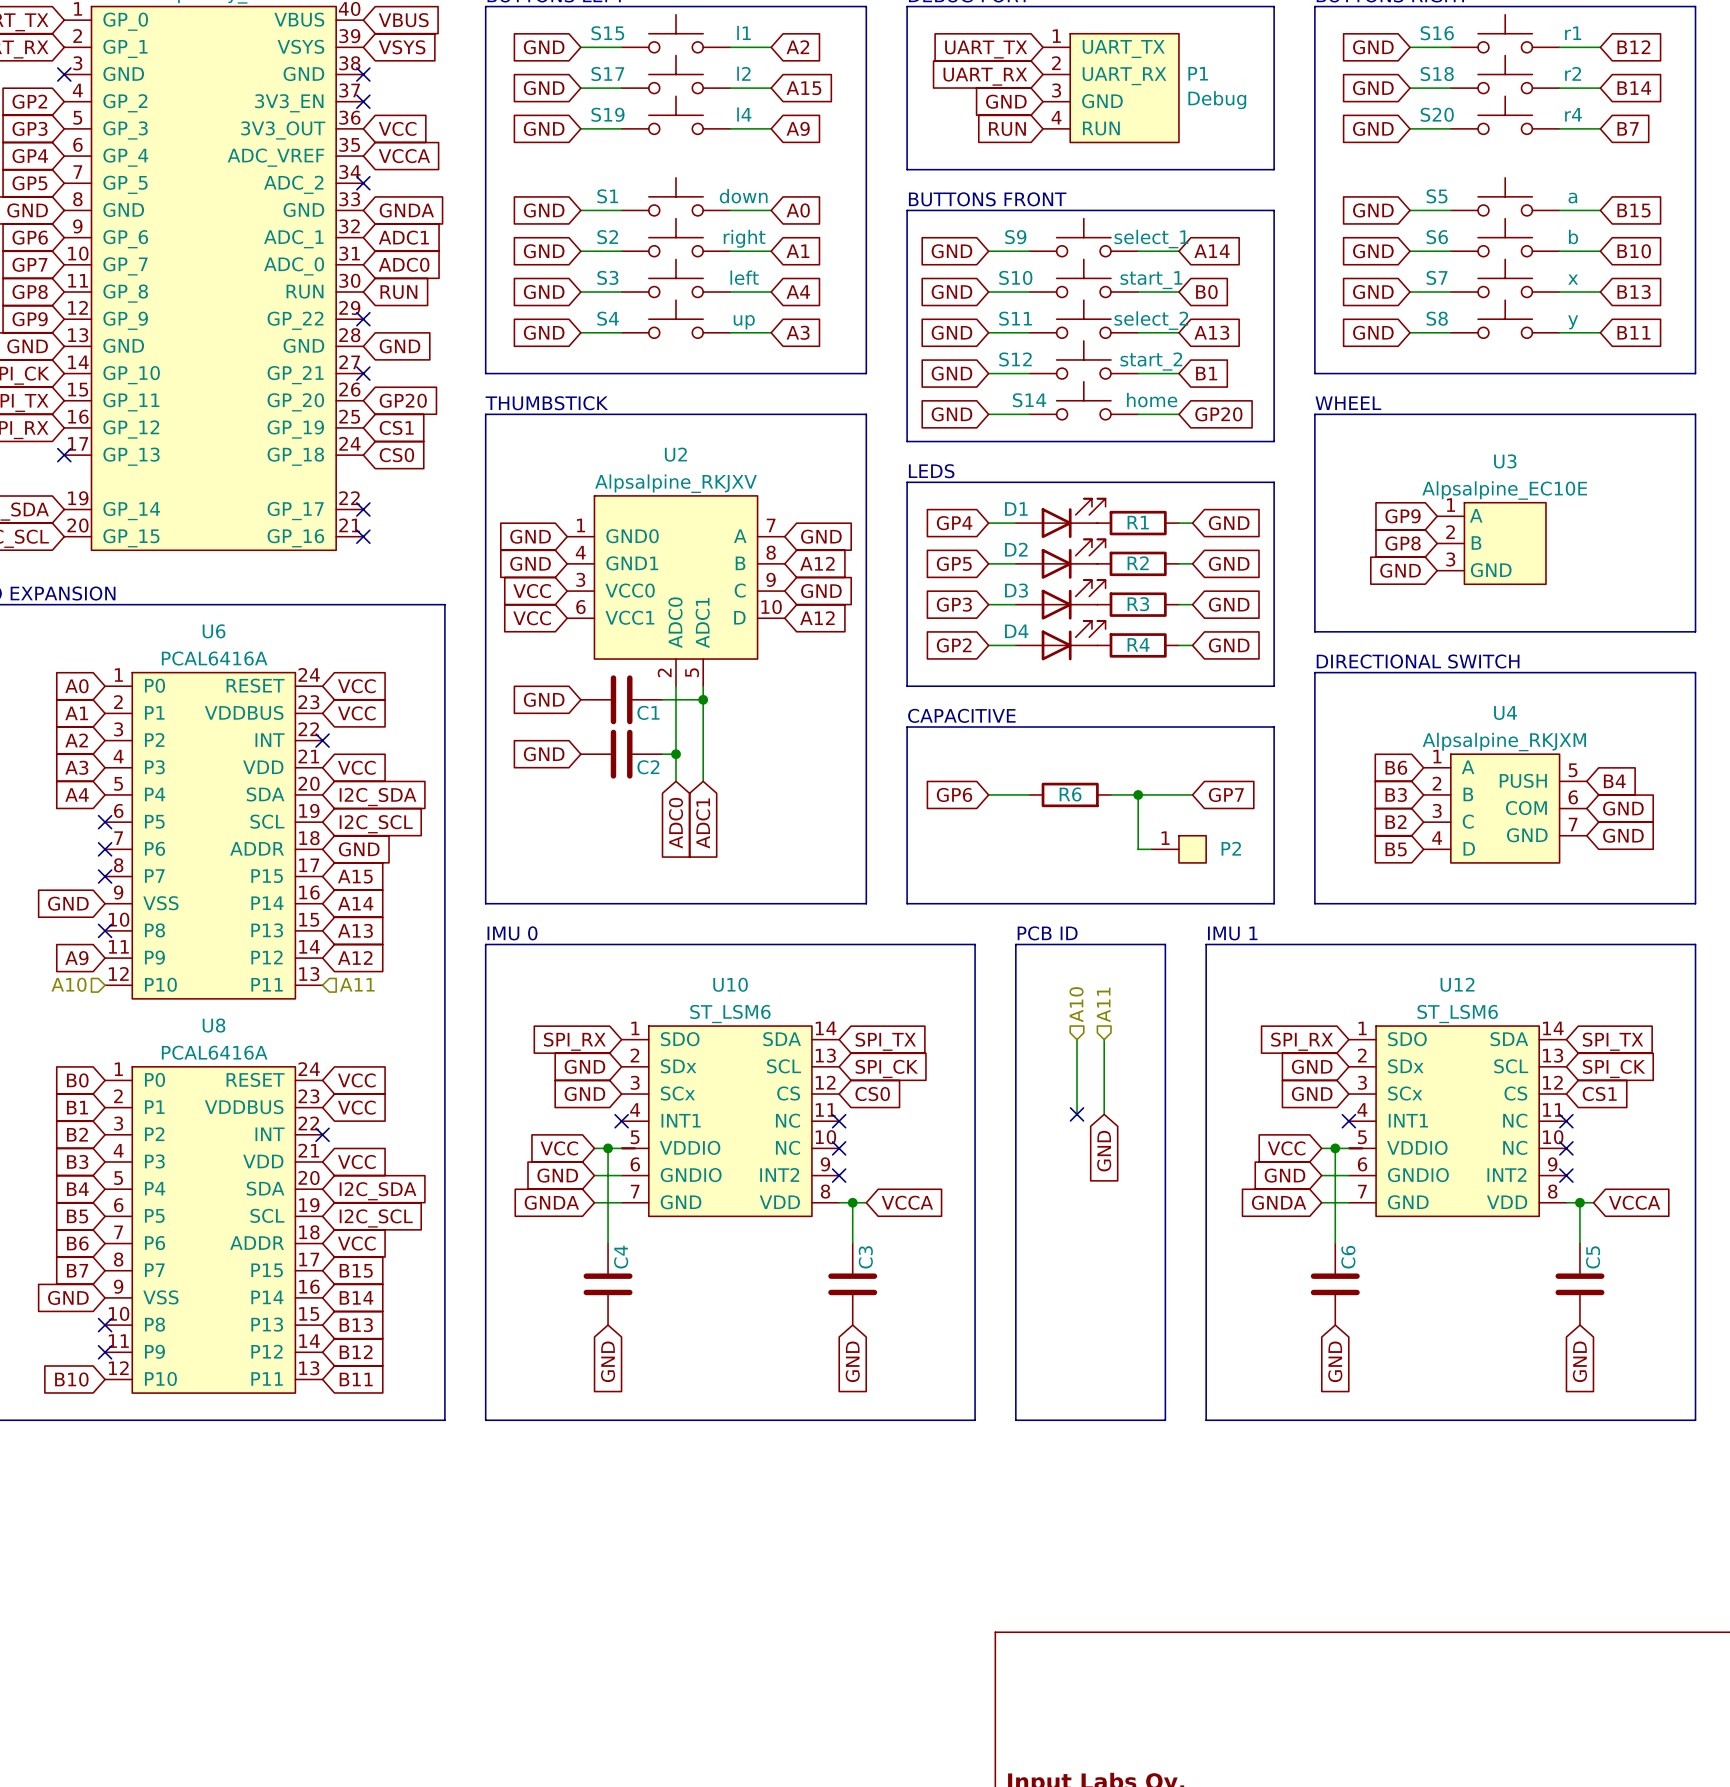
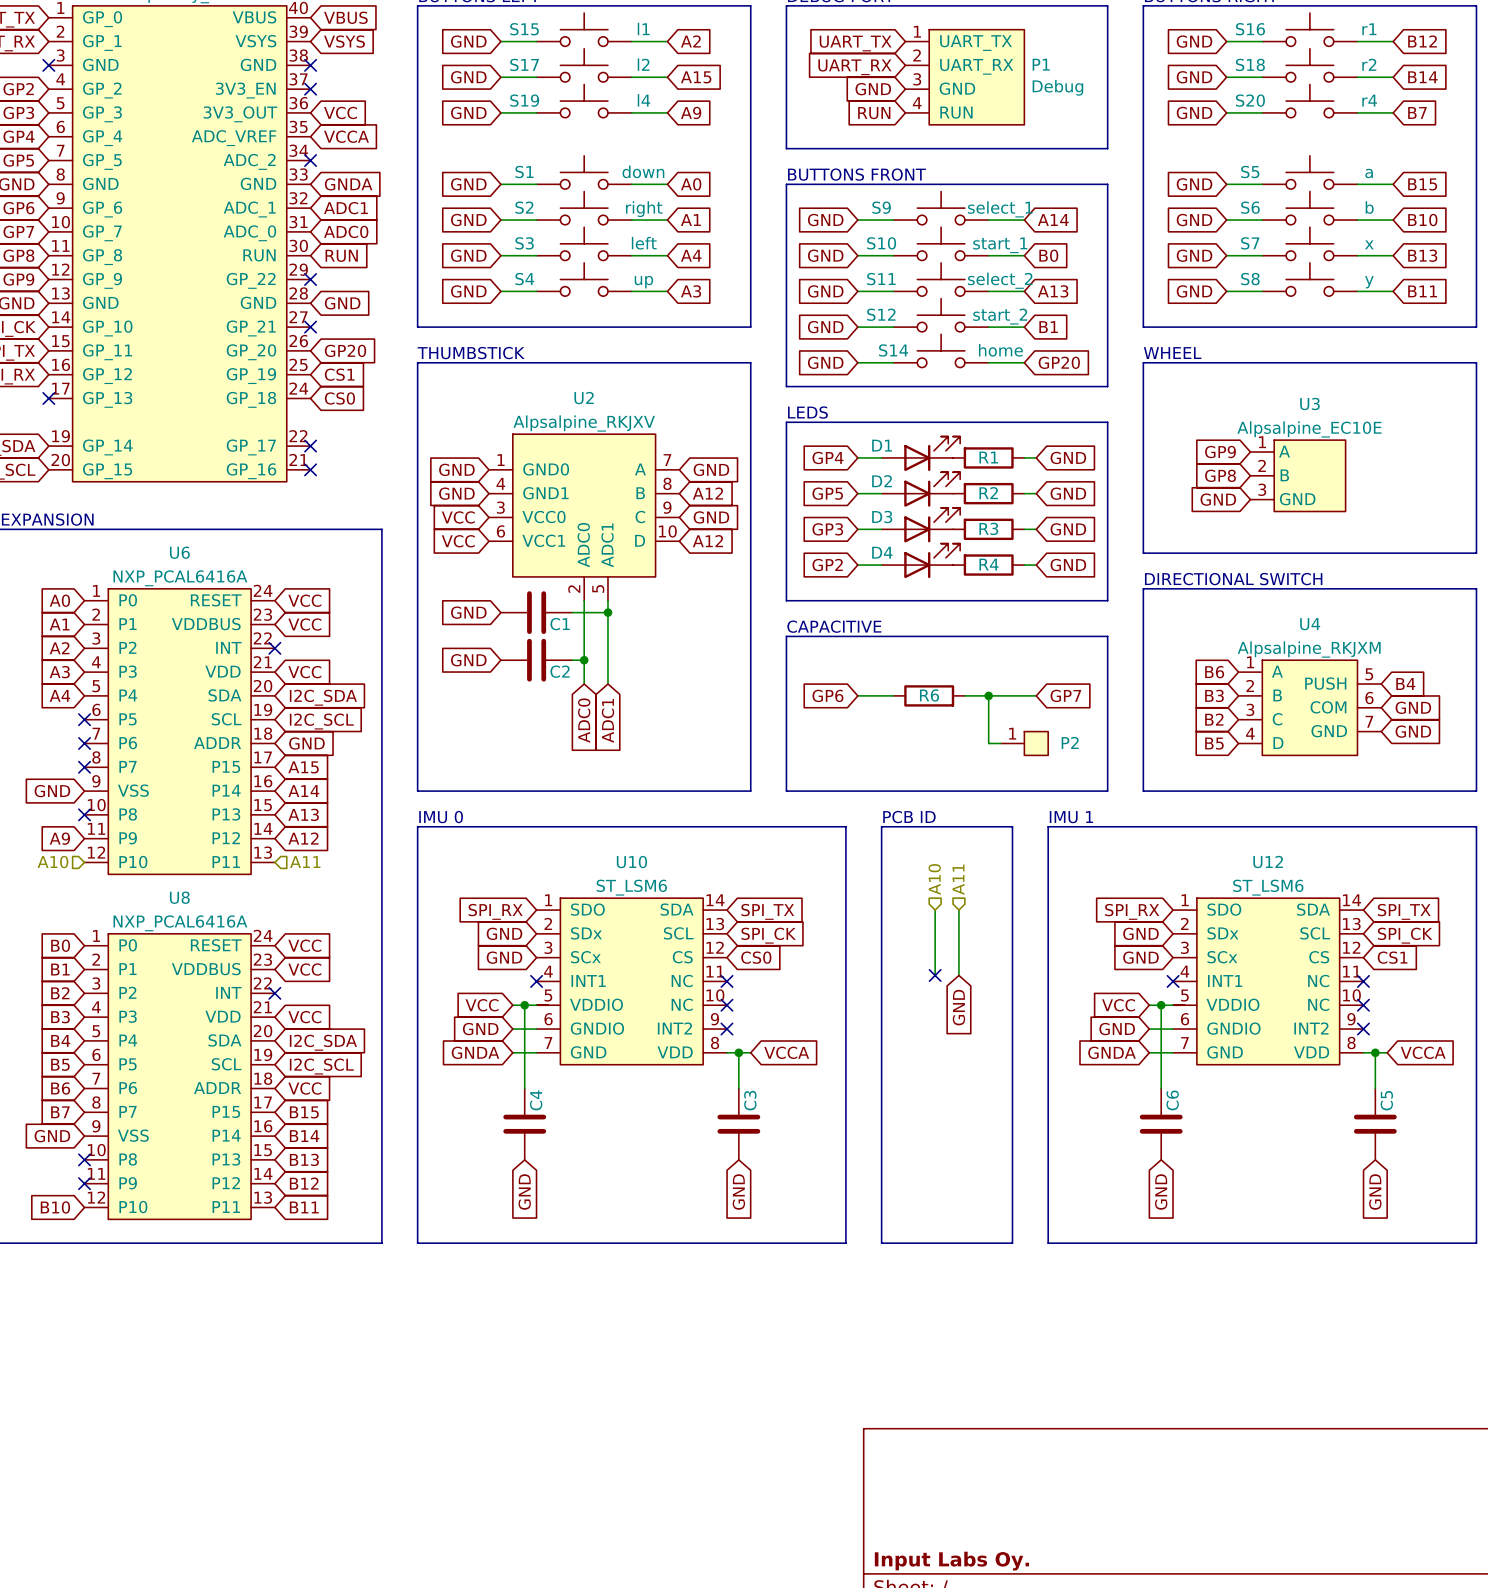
U6 value: PCAL6416A (214, 658) -> NXP_PCAL6416A (180, 578)
U8 value: PCAL6416A (214, 1052) -> NXP_PCAL6416A (180, 923)

